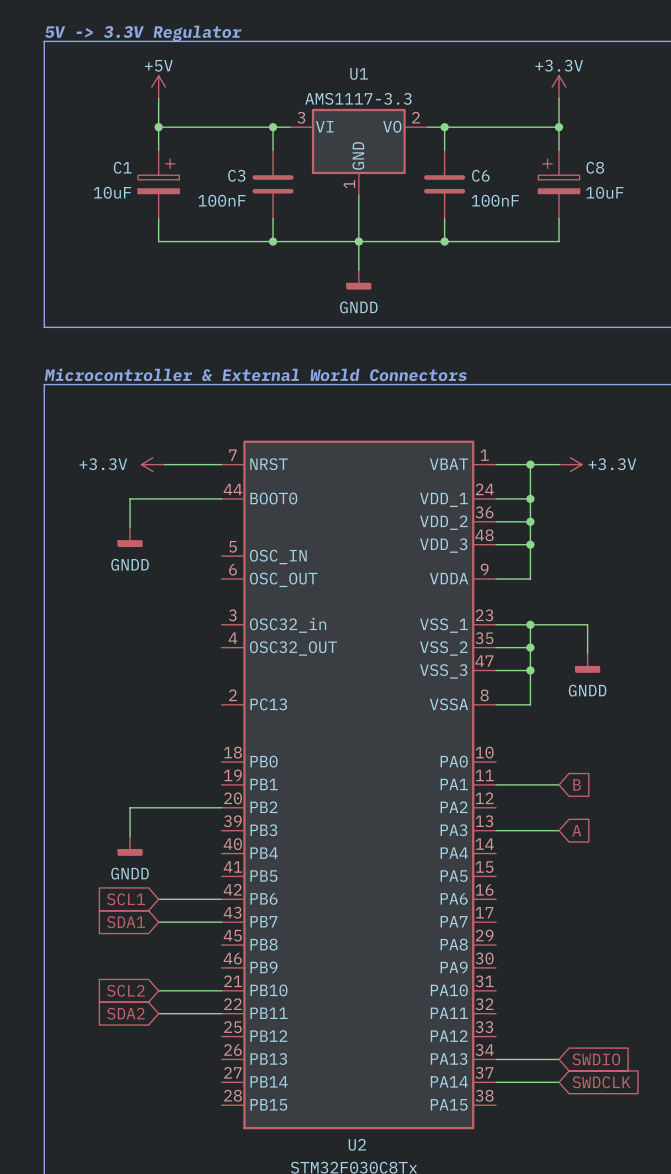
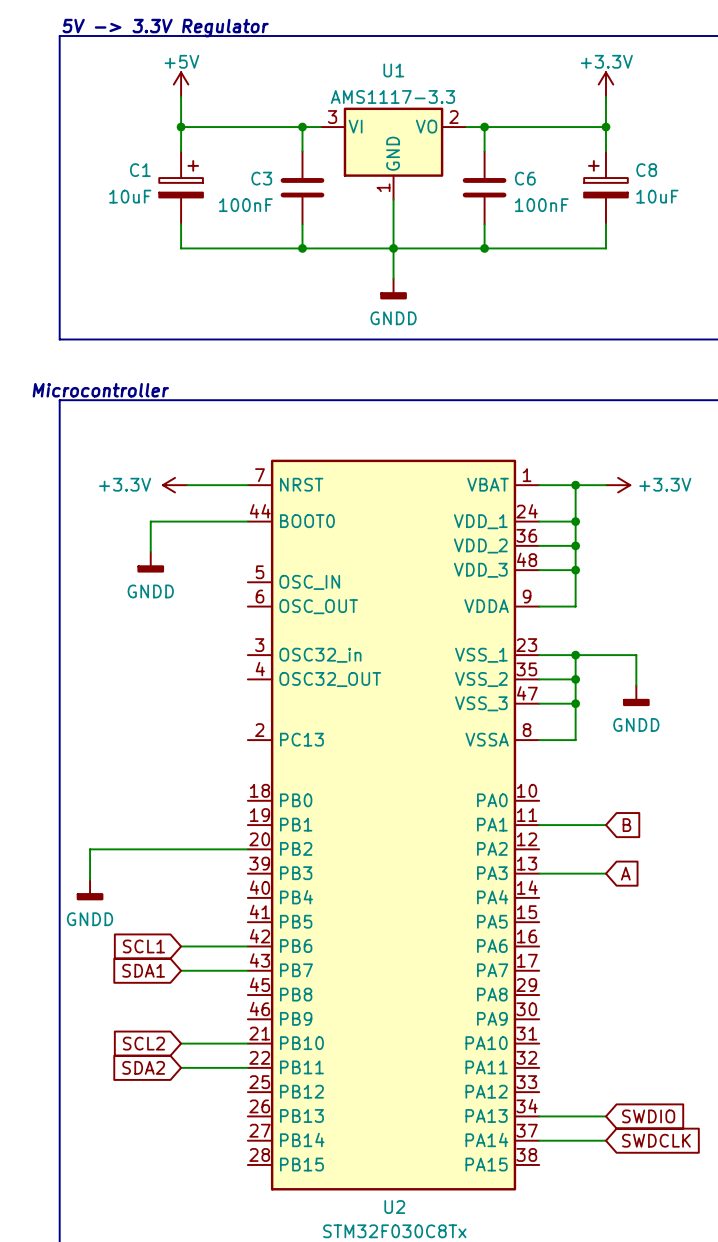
text: none -> Microcontroller (100, 390)
text: Microcontroller & External World Connectors (255, 374) -> none
wire: (130, 807) (130, 836) -> (150, 849) (90, 849) (90, 879)
power symbol position: GNDD (130, 846) -> GNDD (90, 890)

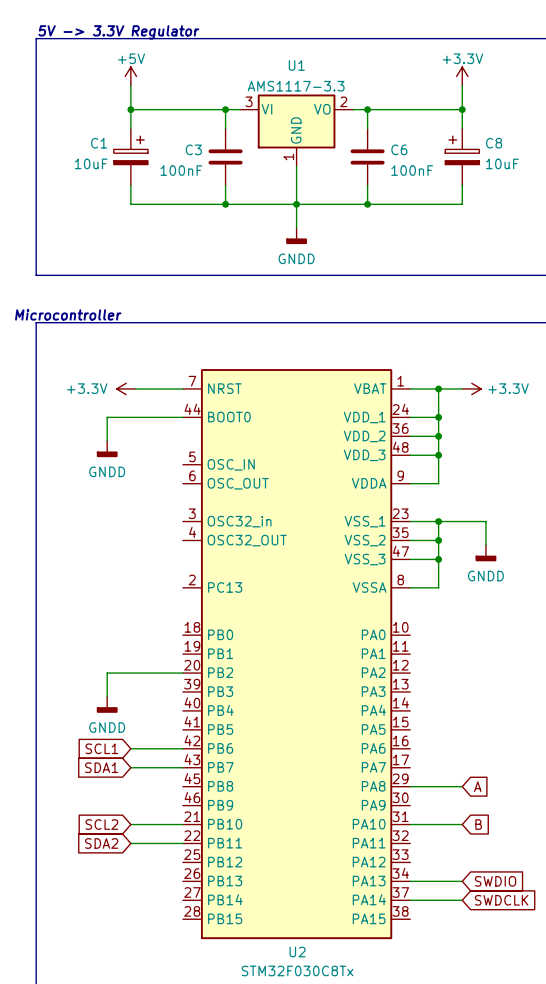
wire: (539, 825) (605, 825) -> (410, 824) (462, 824)
global label position: B (626, 825) -> B (478, 824)
wire: (150, 849) (90, 849) (90, 879) -> (107, 673) (107, 696)
wire: (539, 873) (605, 873) -> (410, 786) (462, 786)
global label position: A (625, 873) -> A (477, 786)
power symbol position: GNDD (90, 890) -> GNDD (107, 704)

